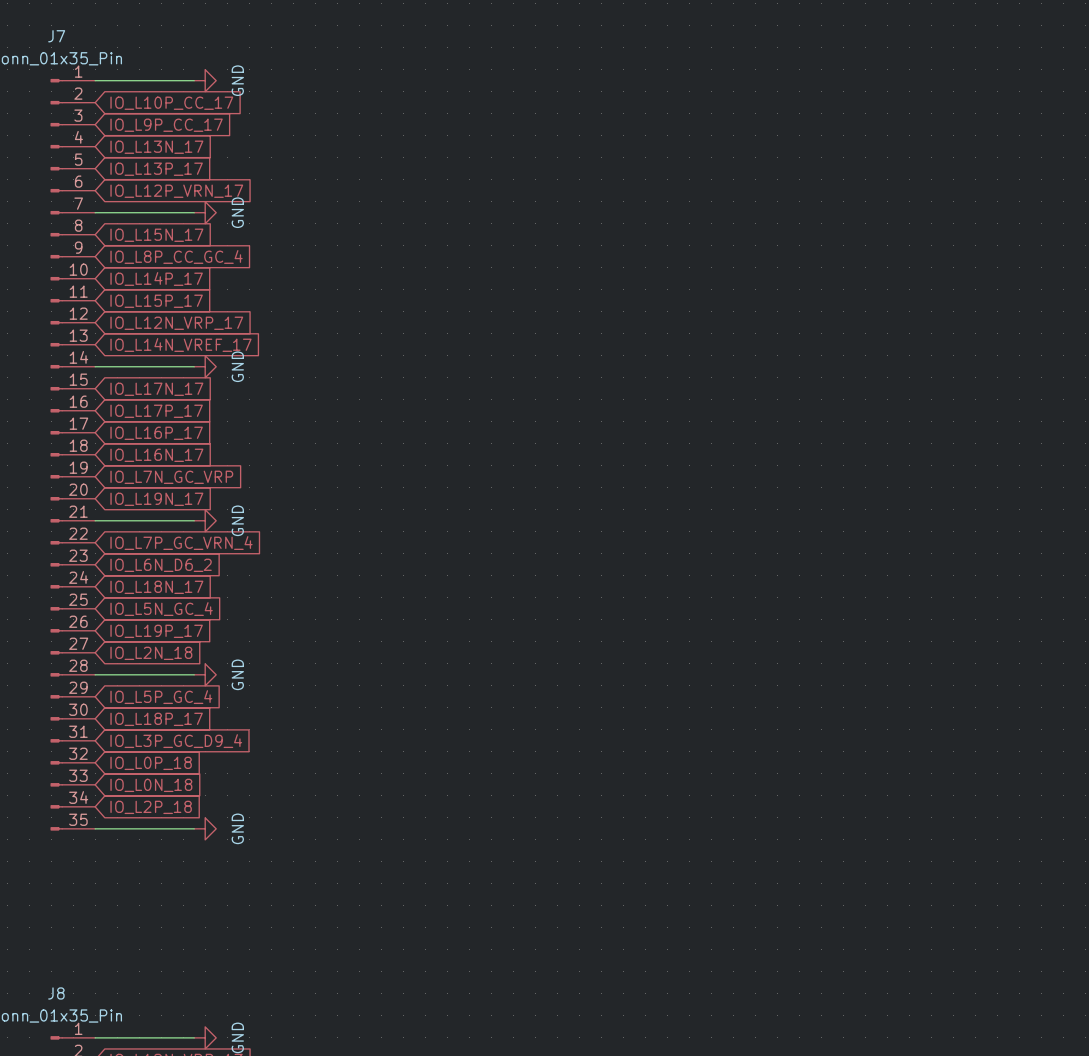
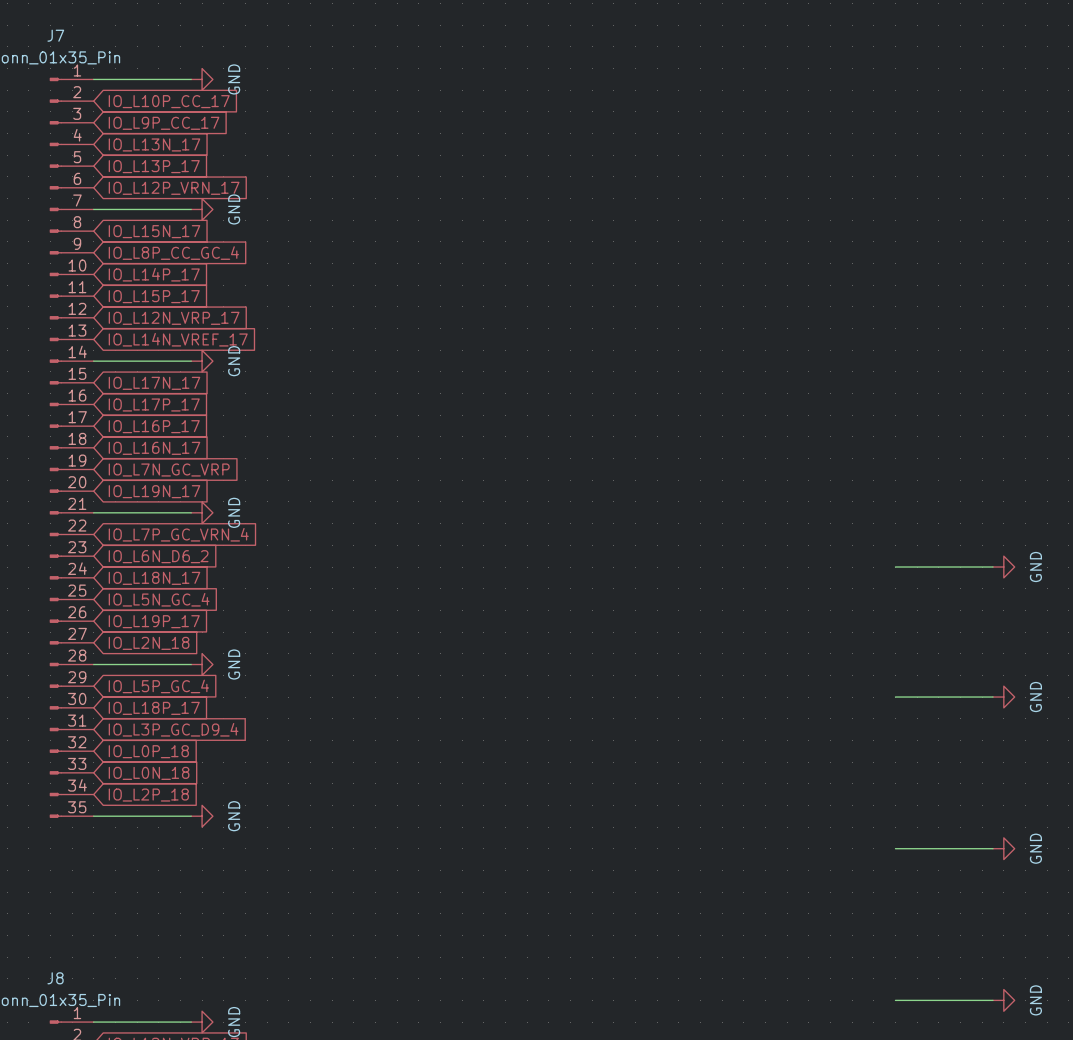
wire: none -> (895, 567) (992, 567)
power symbol: none -> GND (1003, 567)
wire: none -> (895, 697) (992, 697)
power symbol: none -> GND (1003, 697)
wire: none -> (895, 848) (992, 848)
power symbol: none -> GND (1003, 848)
wire: none -> (895, 1000) (992, 1000)
power symbol: none -> GND (1003, 1000)

